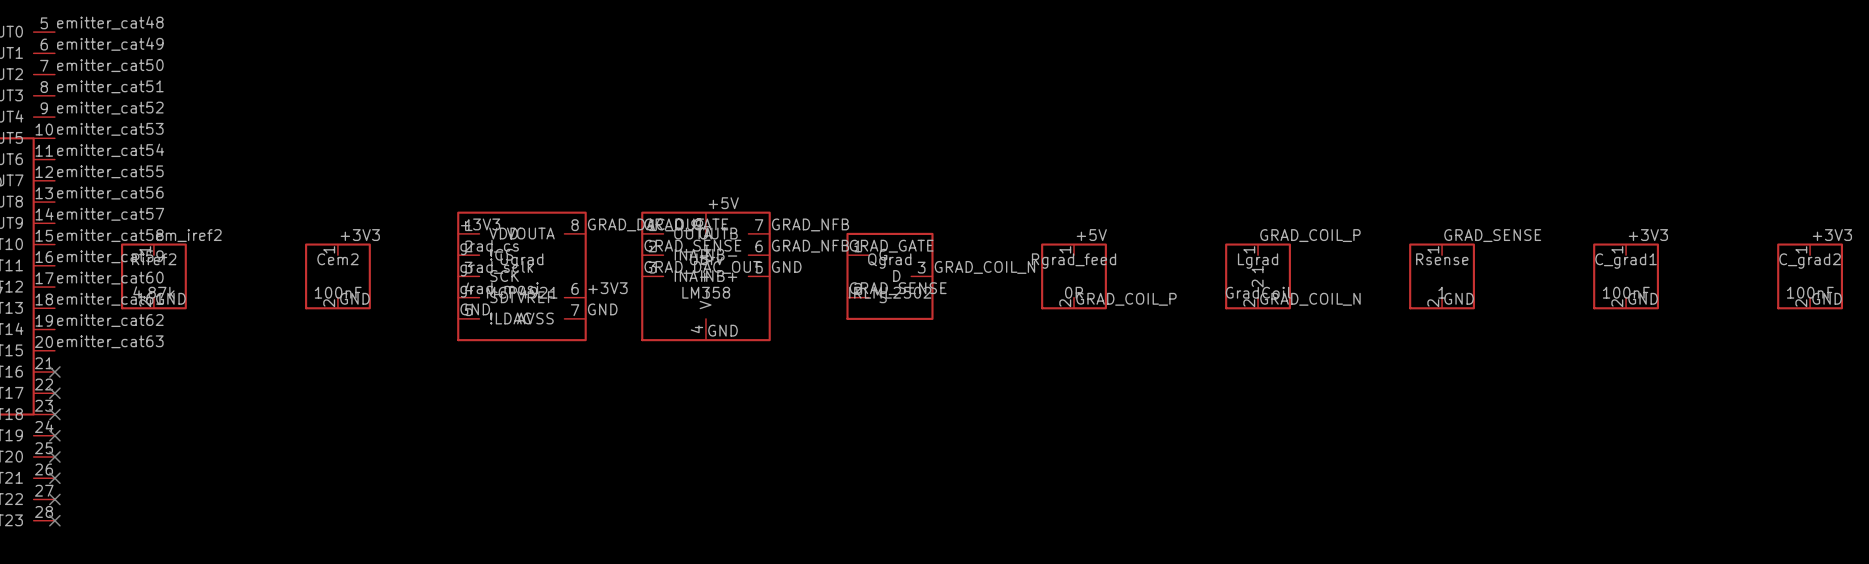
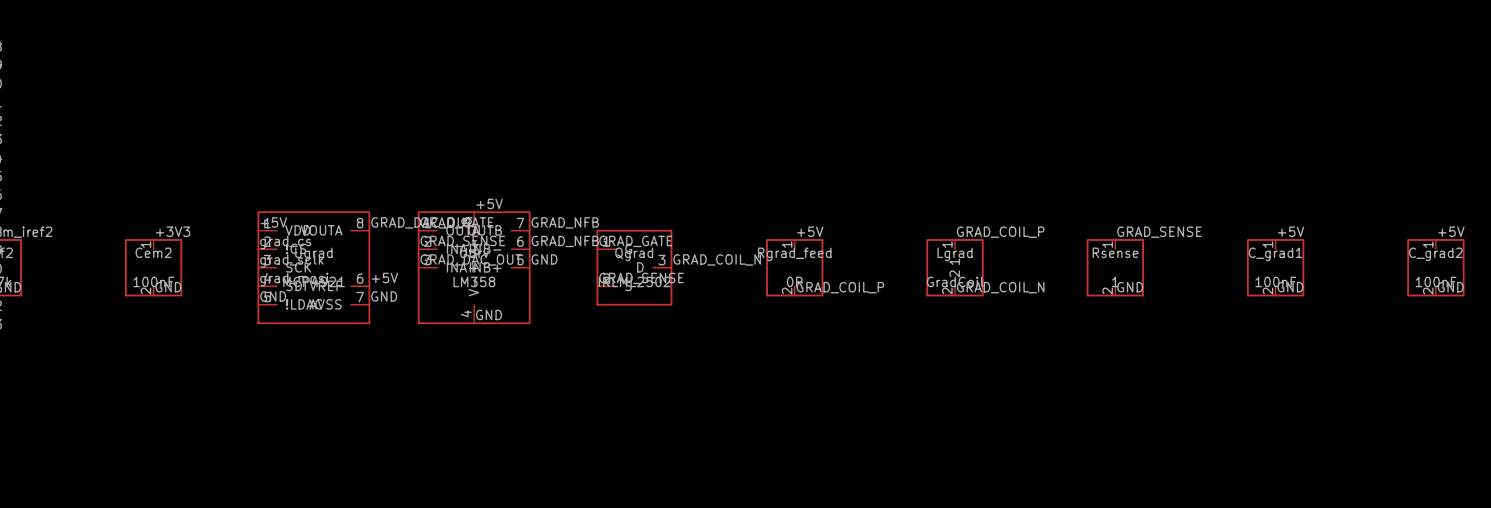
label: +3V3 (480, 224) -> +5V (273, 222)
label: +3V3 (1648, 235) -> +5V (1291, 231)
label: +3V3 (1832, 235) -> +5V (1451, 231)
label: +3V3 (608, 288) -> +5V (384, 277)

